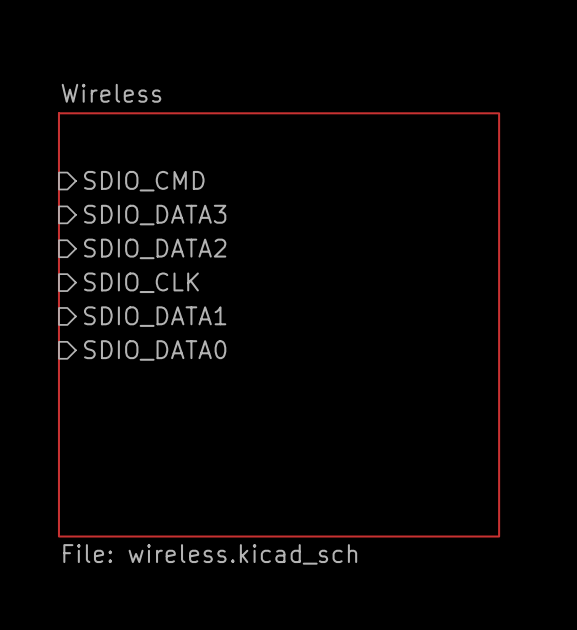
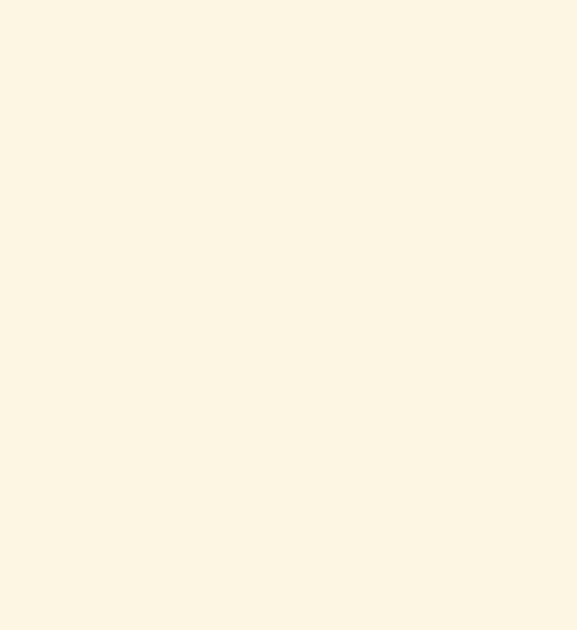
sheet pin: SDIO_CMD (144, 181) -> none
sheet pin: SDIO_DATA3 (155, 215) -> none
sheet pin: SDIO_DATA2 (155, 248) -> none
sheet pin: SDIO_CLK (141, 282) -> none
sheet pin: SDIO_DATA1 (155, 316) -> none
sheet Wireless: File: wireless.kicad_sch (279, 324) -> none
sheet pin: SDIO_DATA0 (155, 350) -> none

